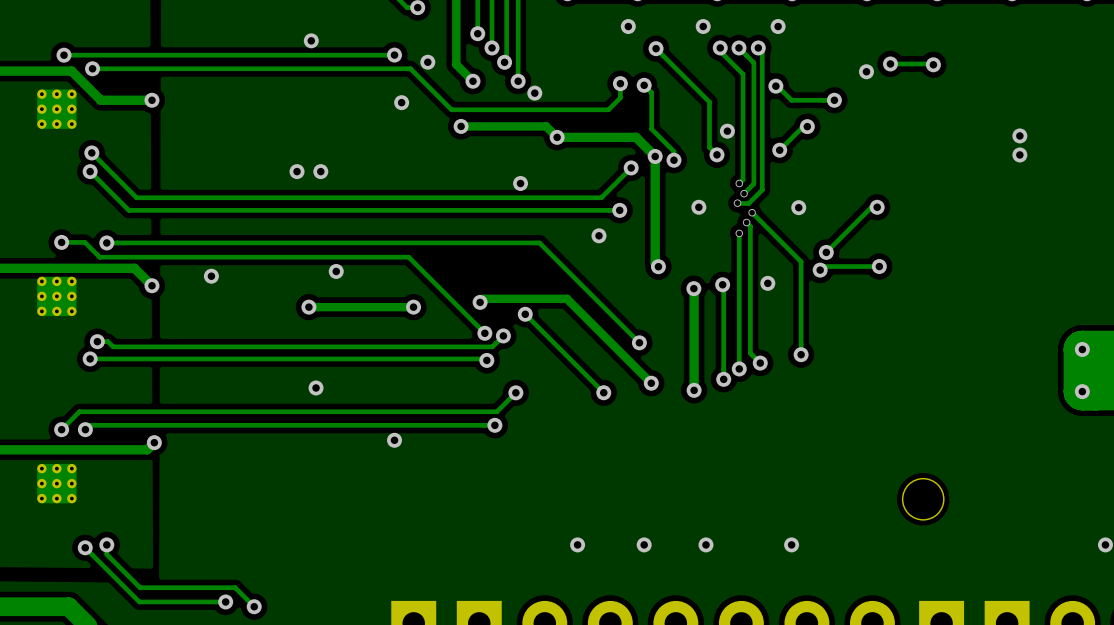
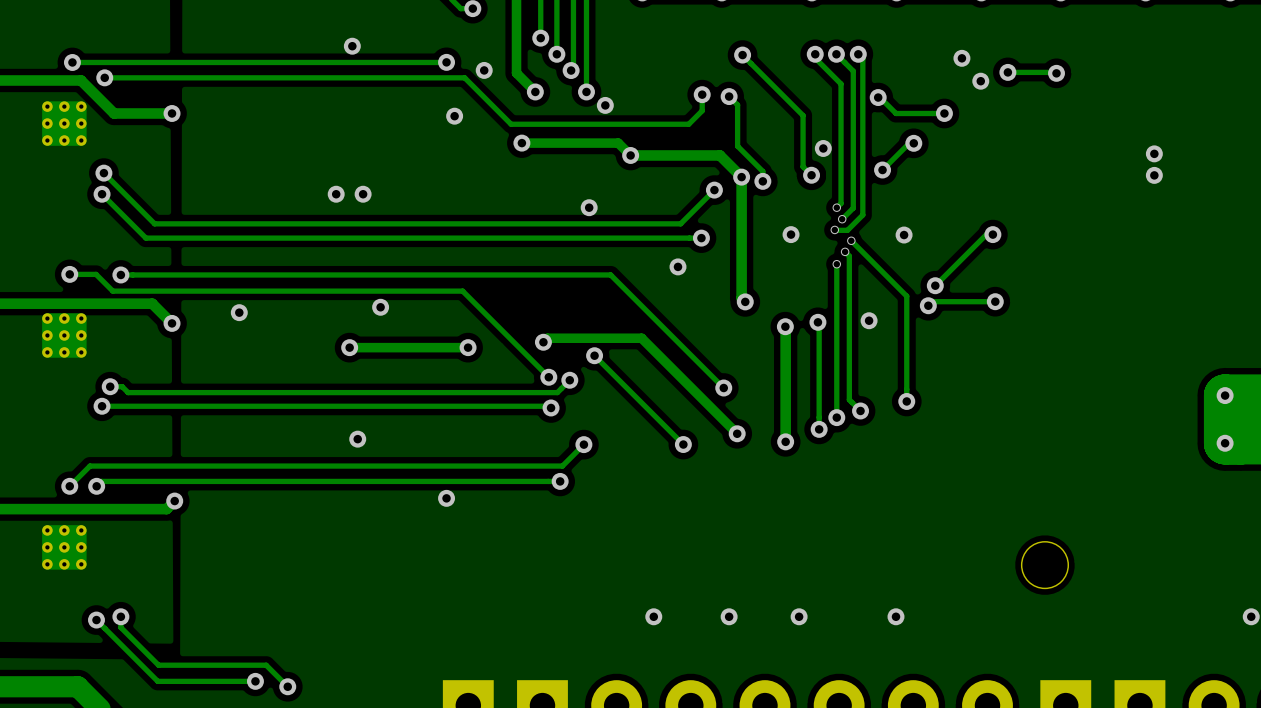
via: (628, 26) -> none
via: (703, 26) -> none
via: (778, 26) -> none
via: none -> (961, 58)

